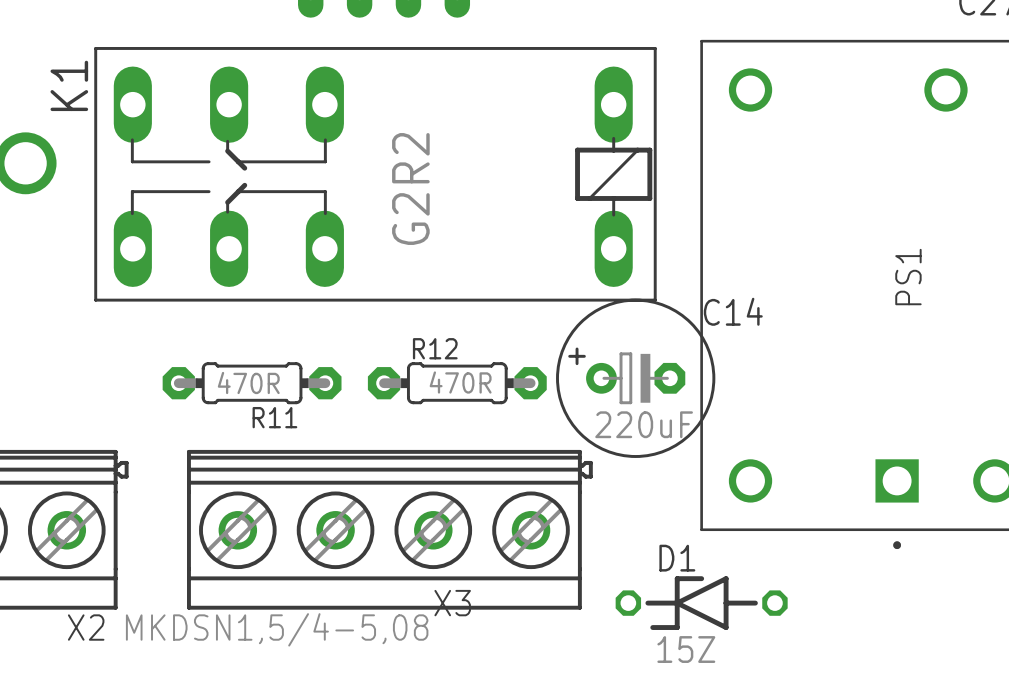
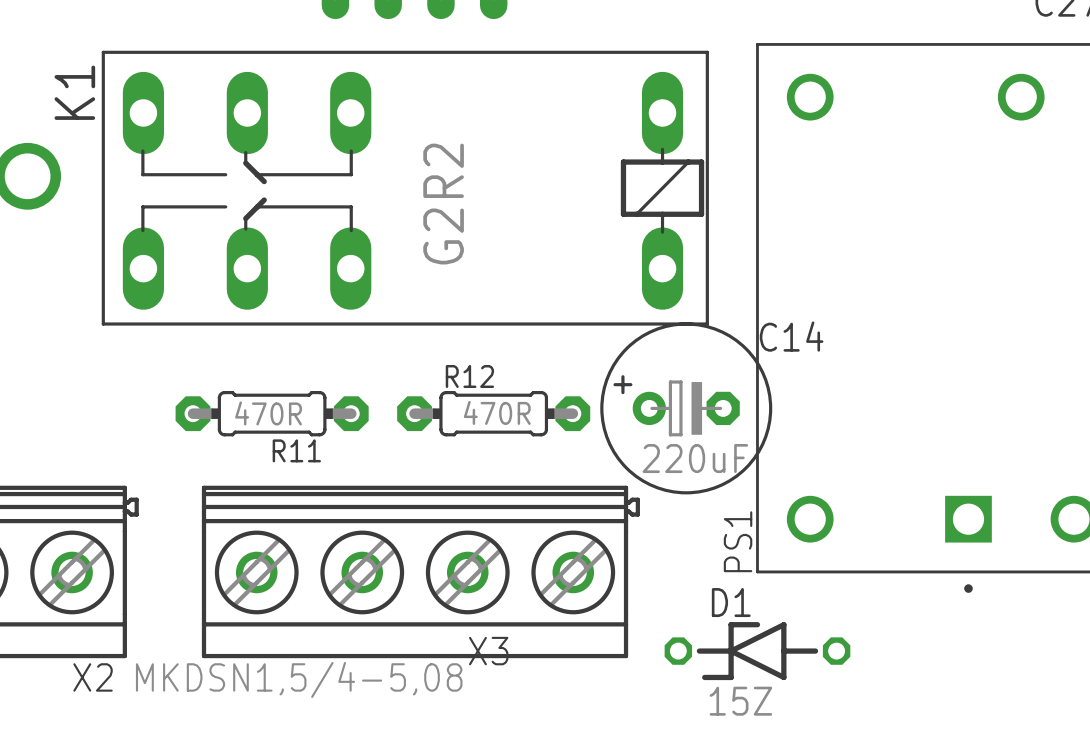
PS1 name position: PS1 (908, 277) -> PS1 (738, 541)

